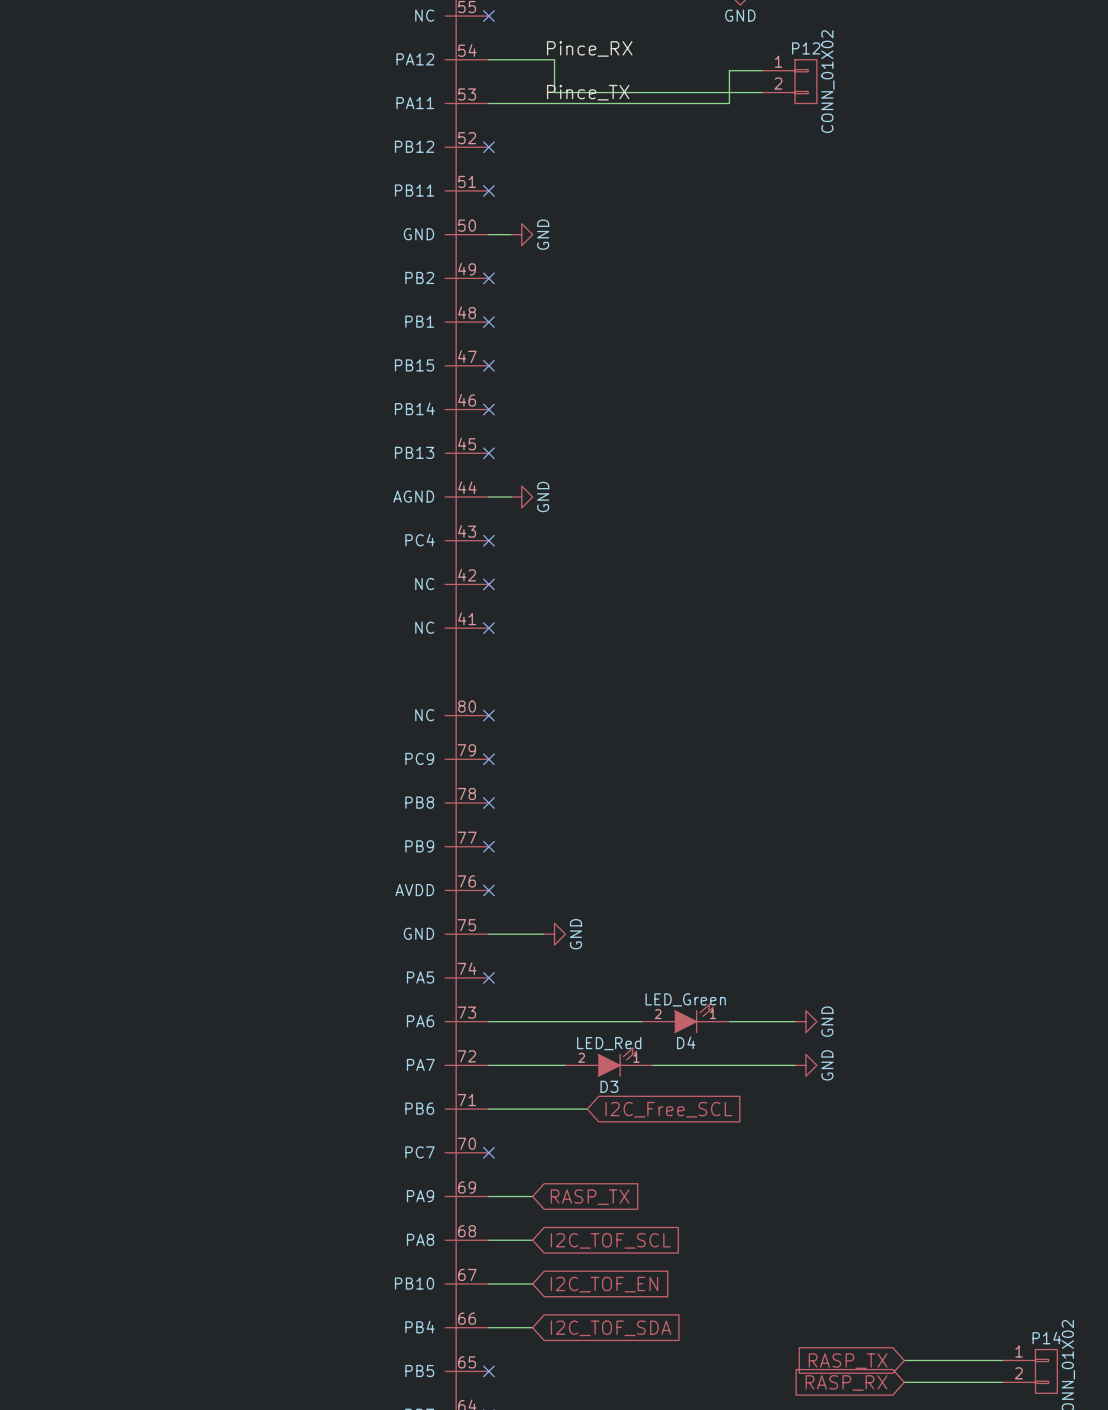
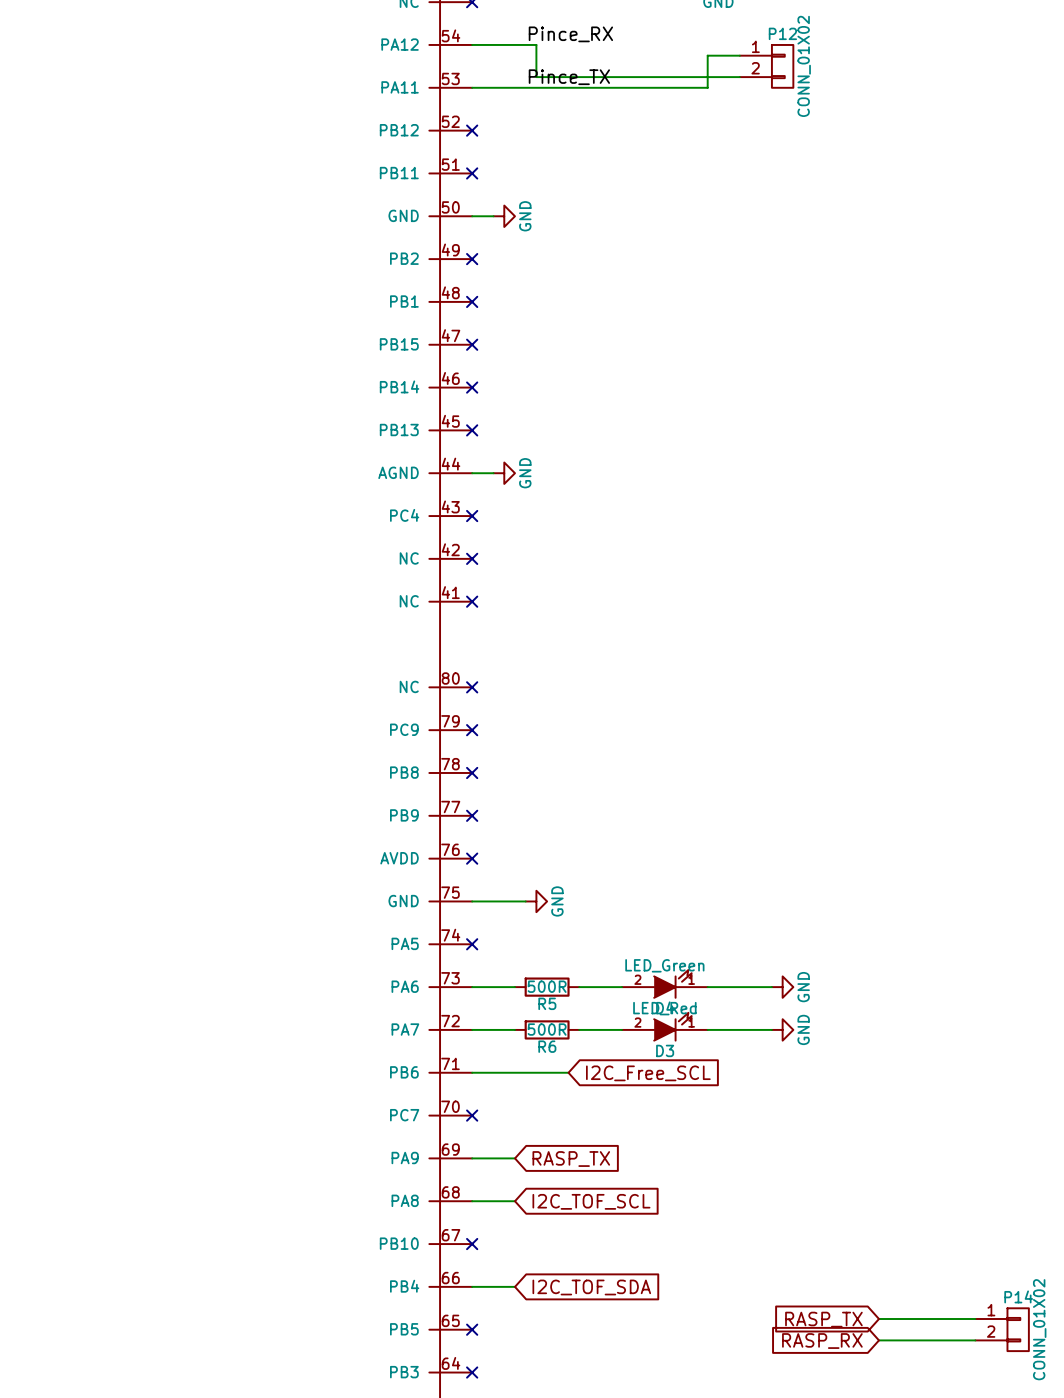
R5: none -> 500R (547, 987)
D3 position: (609, 1062) -> (664, 1026)
wire: (532, 1065) (565, 1065) -> none
R6: none -> 500R (547, 1029)
wire: (488, 1283) (532, 1283) -> none
no-connect mark: none -> (472, 1244)
global label: I2C_TOF_EN (604, 1284) -> none

